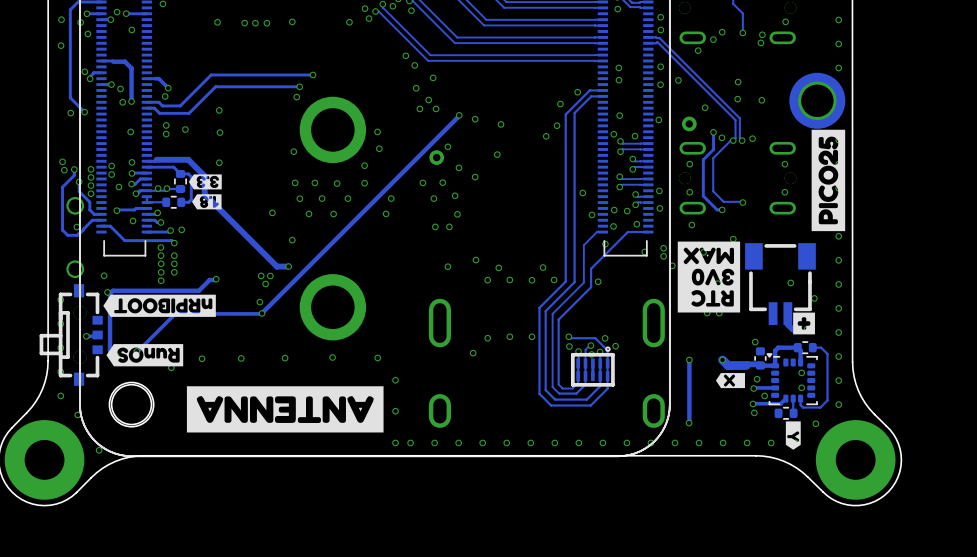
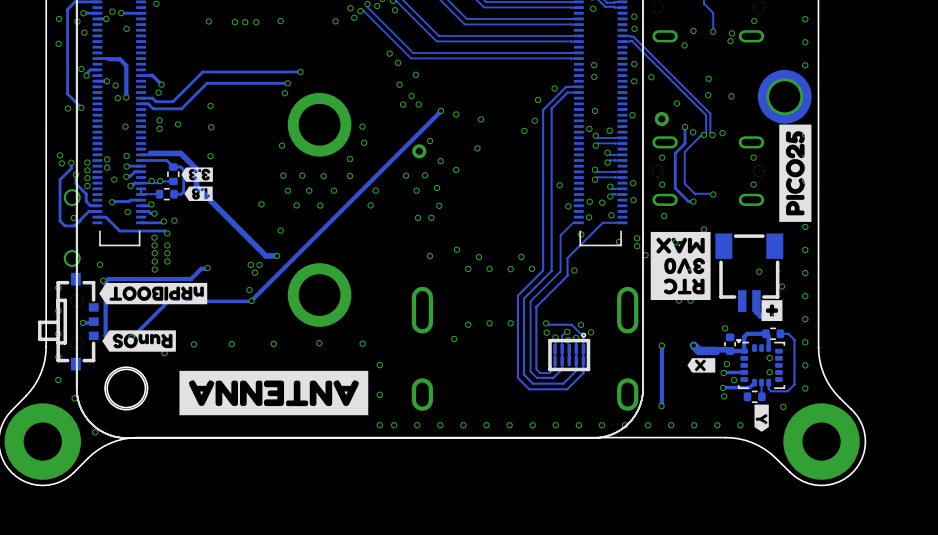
via: (713, 39) -> none
via: none -> (684, 45)
via: (698, 50) -> none

